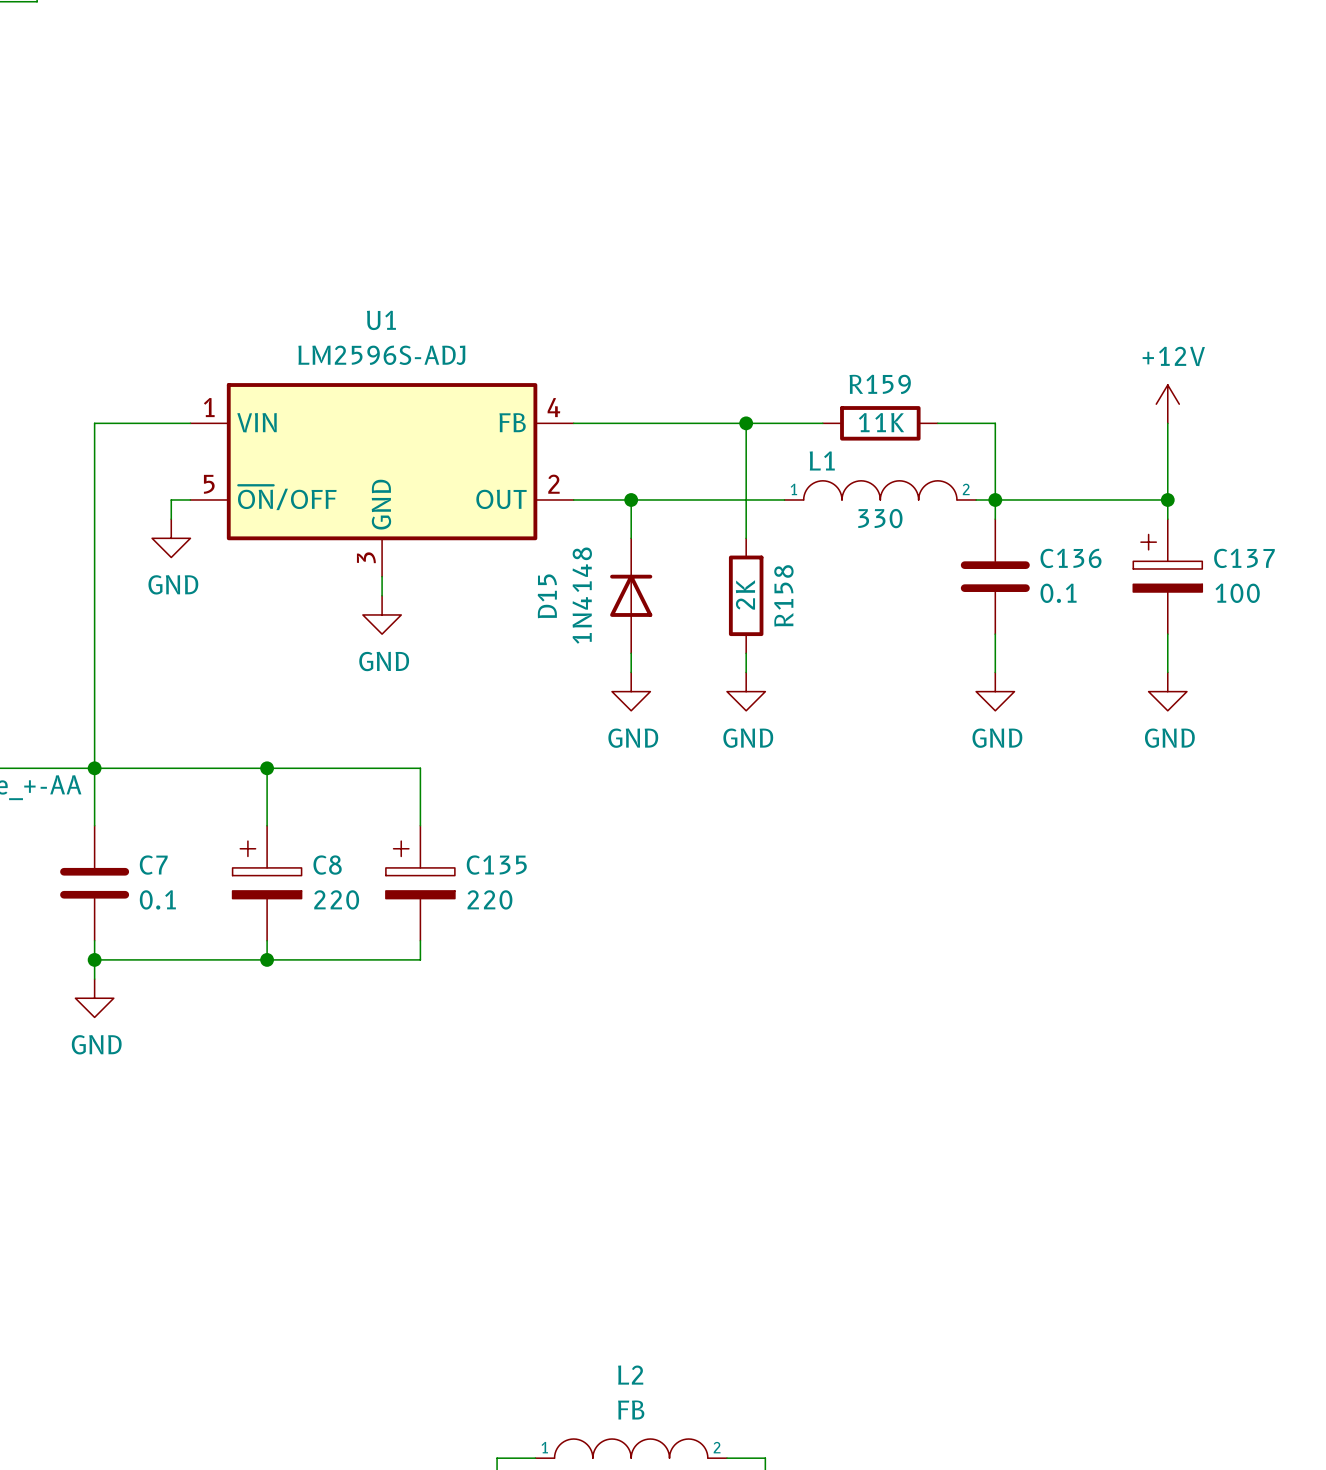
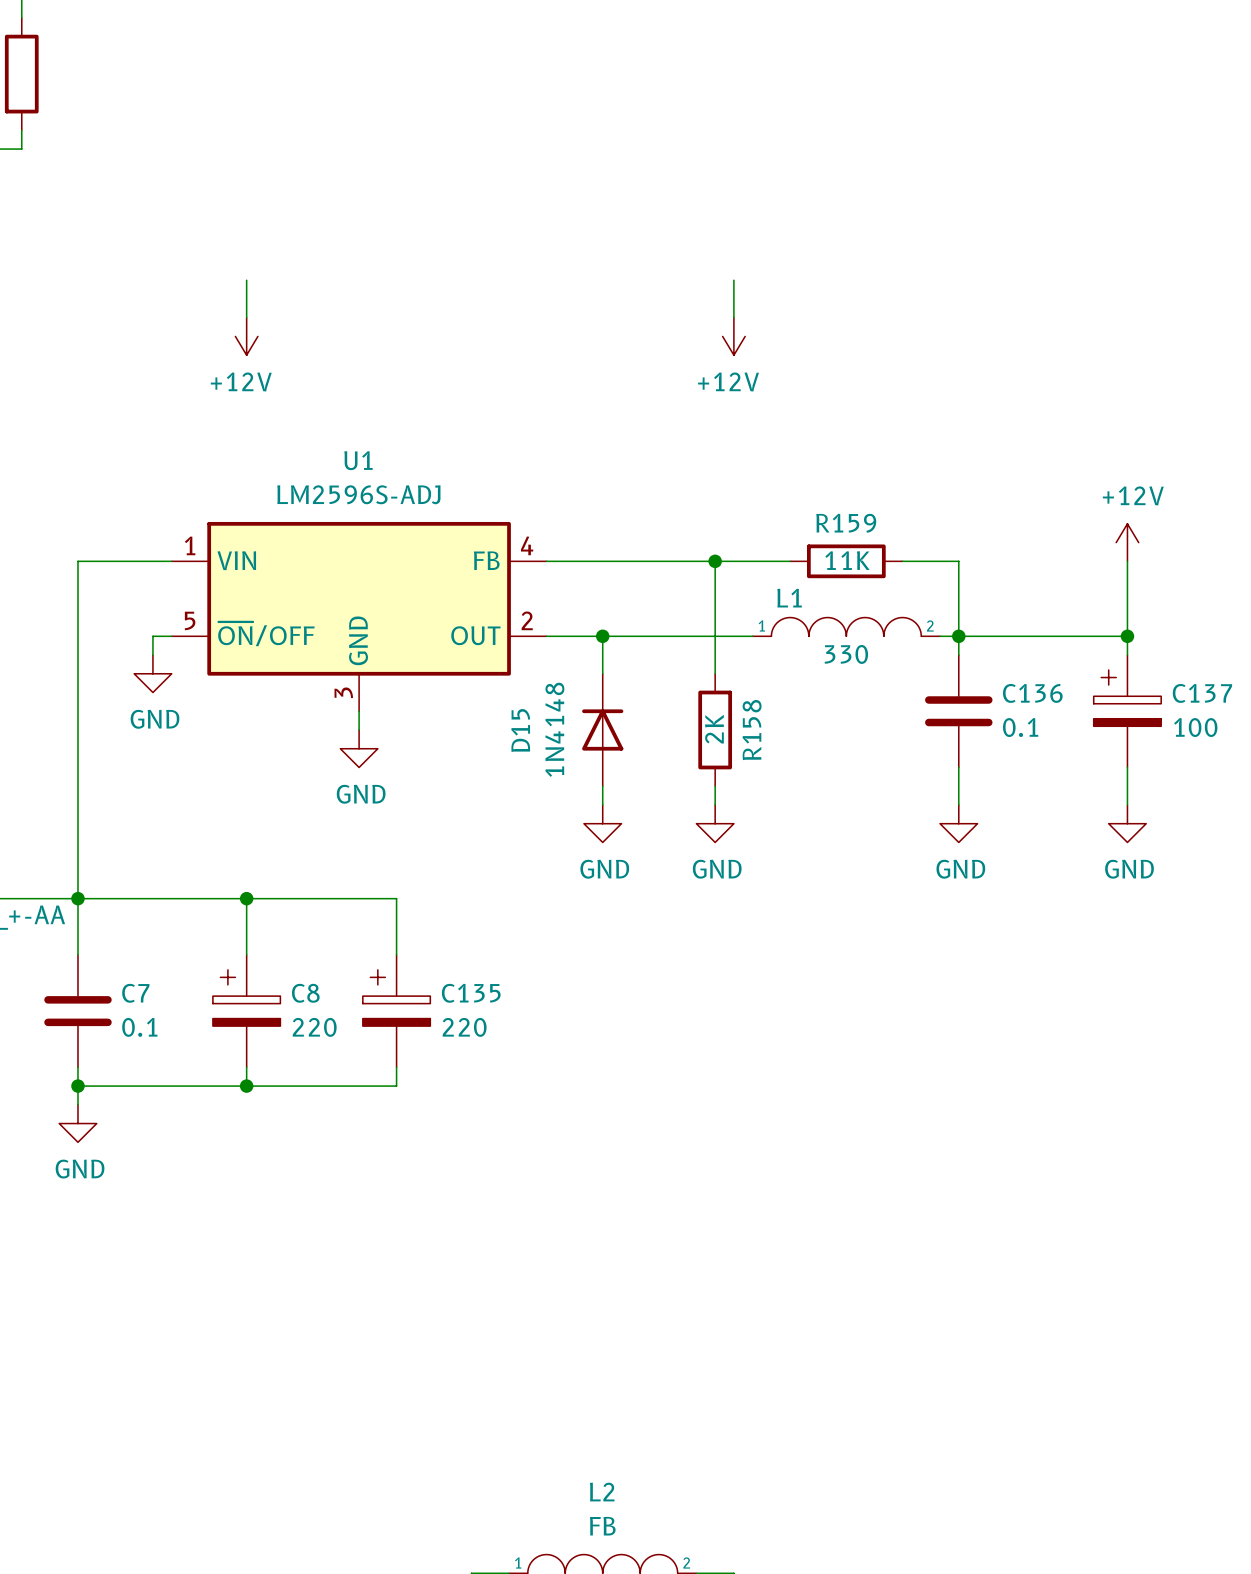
wire: none -> (246, 280) (246, 317)
wire: none -> (733, 280) (733, 317)
power symbol: none -> +12V (246, 336)
power symbol: none -> +12V (733, 336)

